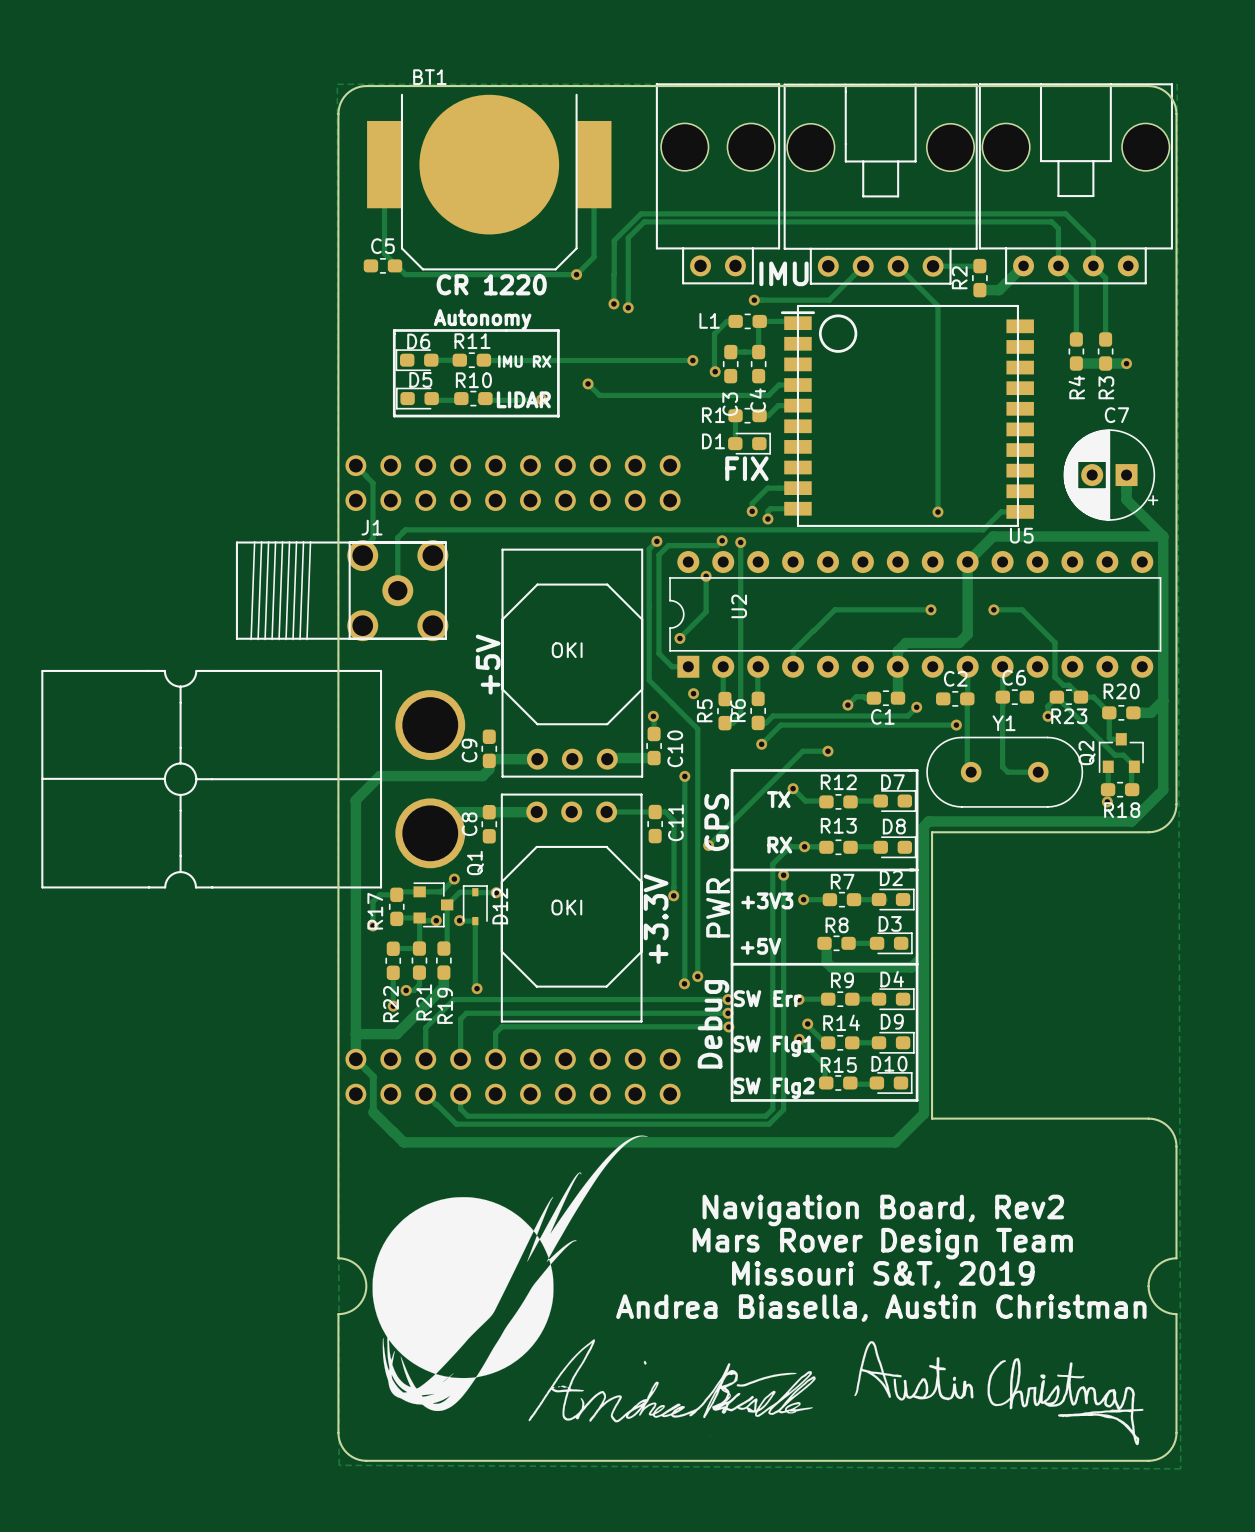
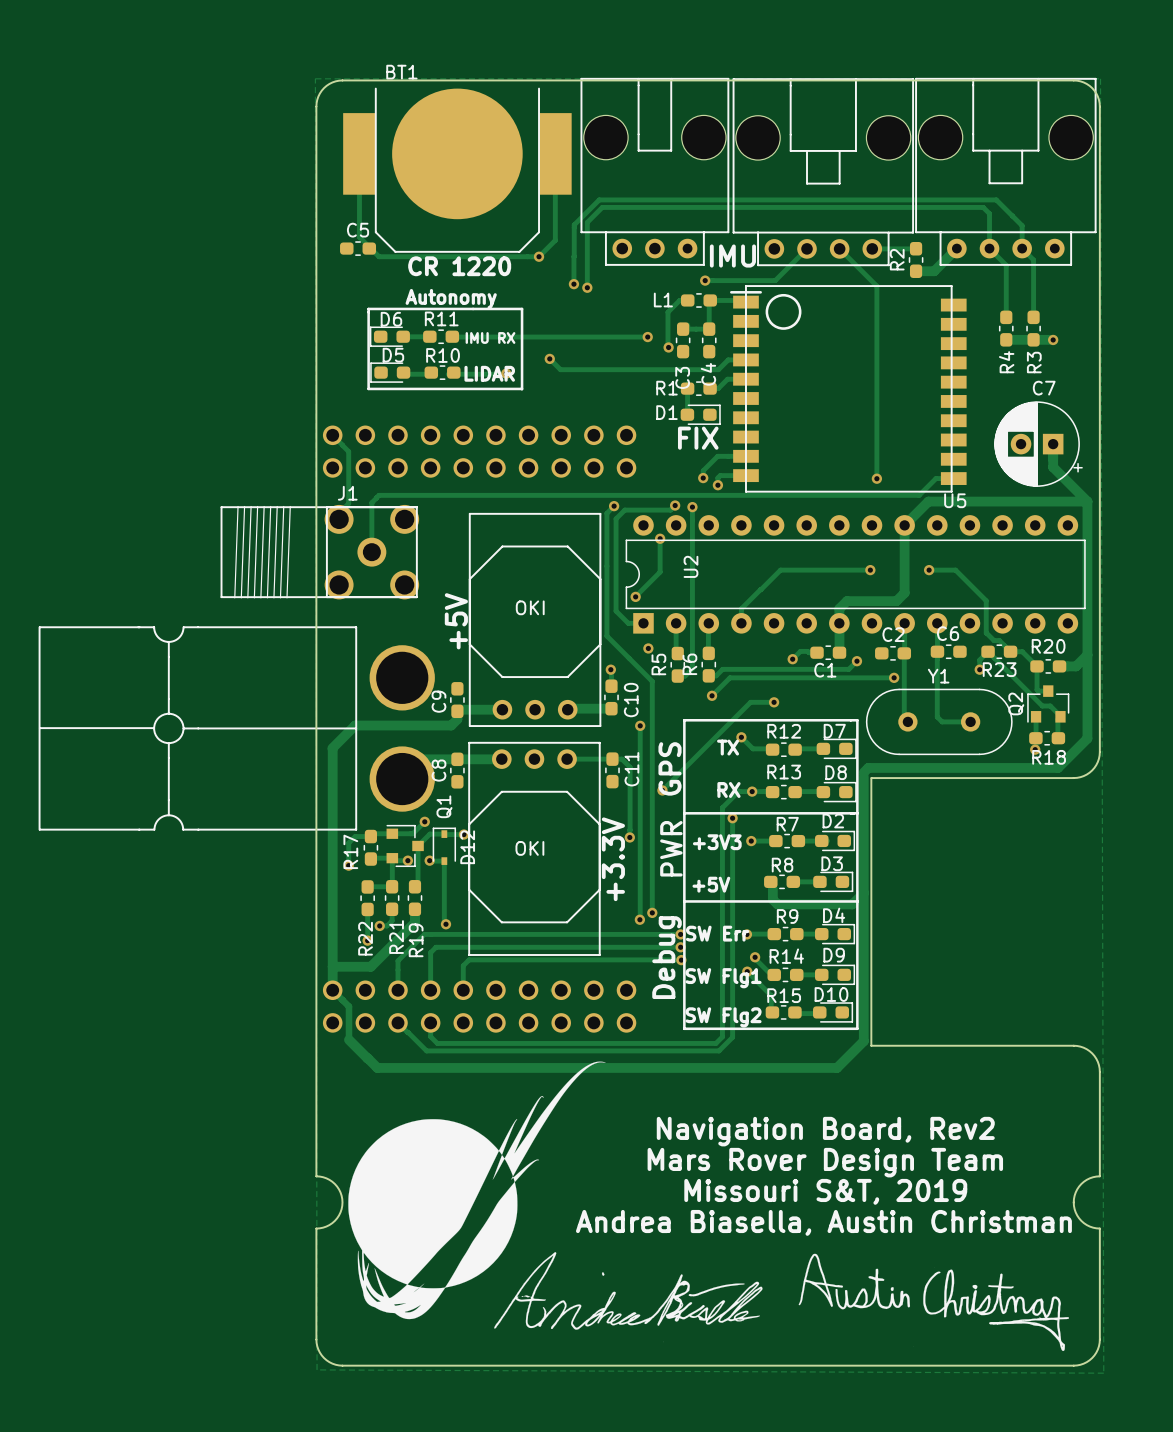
part: none -> (654, 171)
part: (718, 183) -> none

